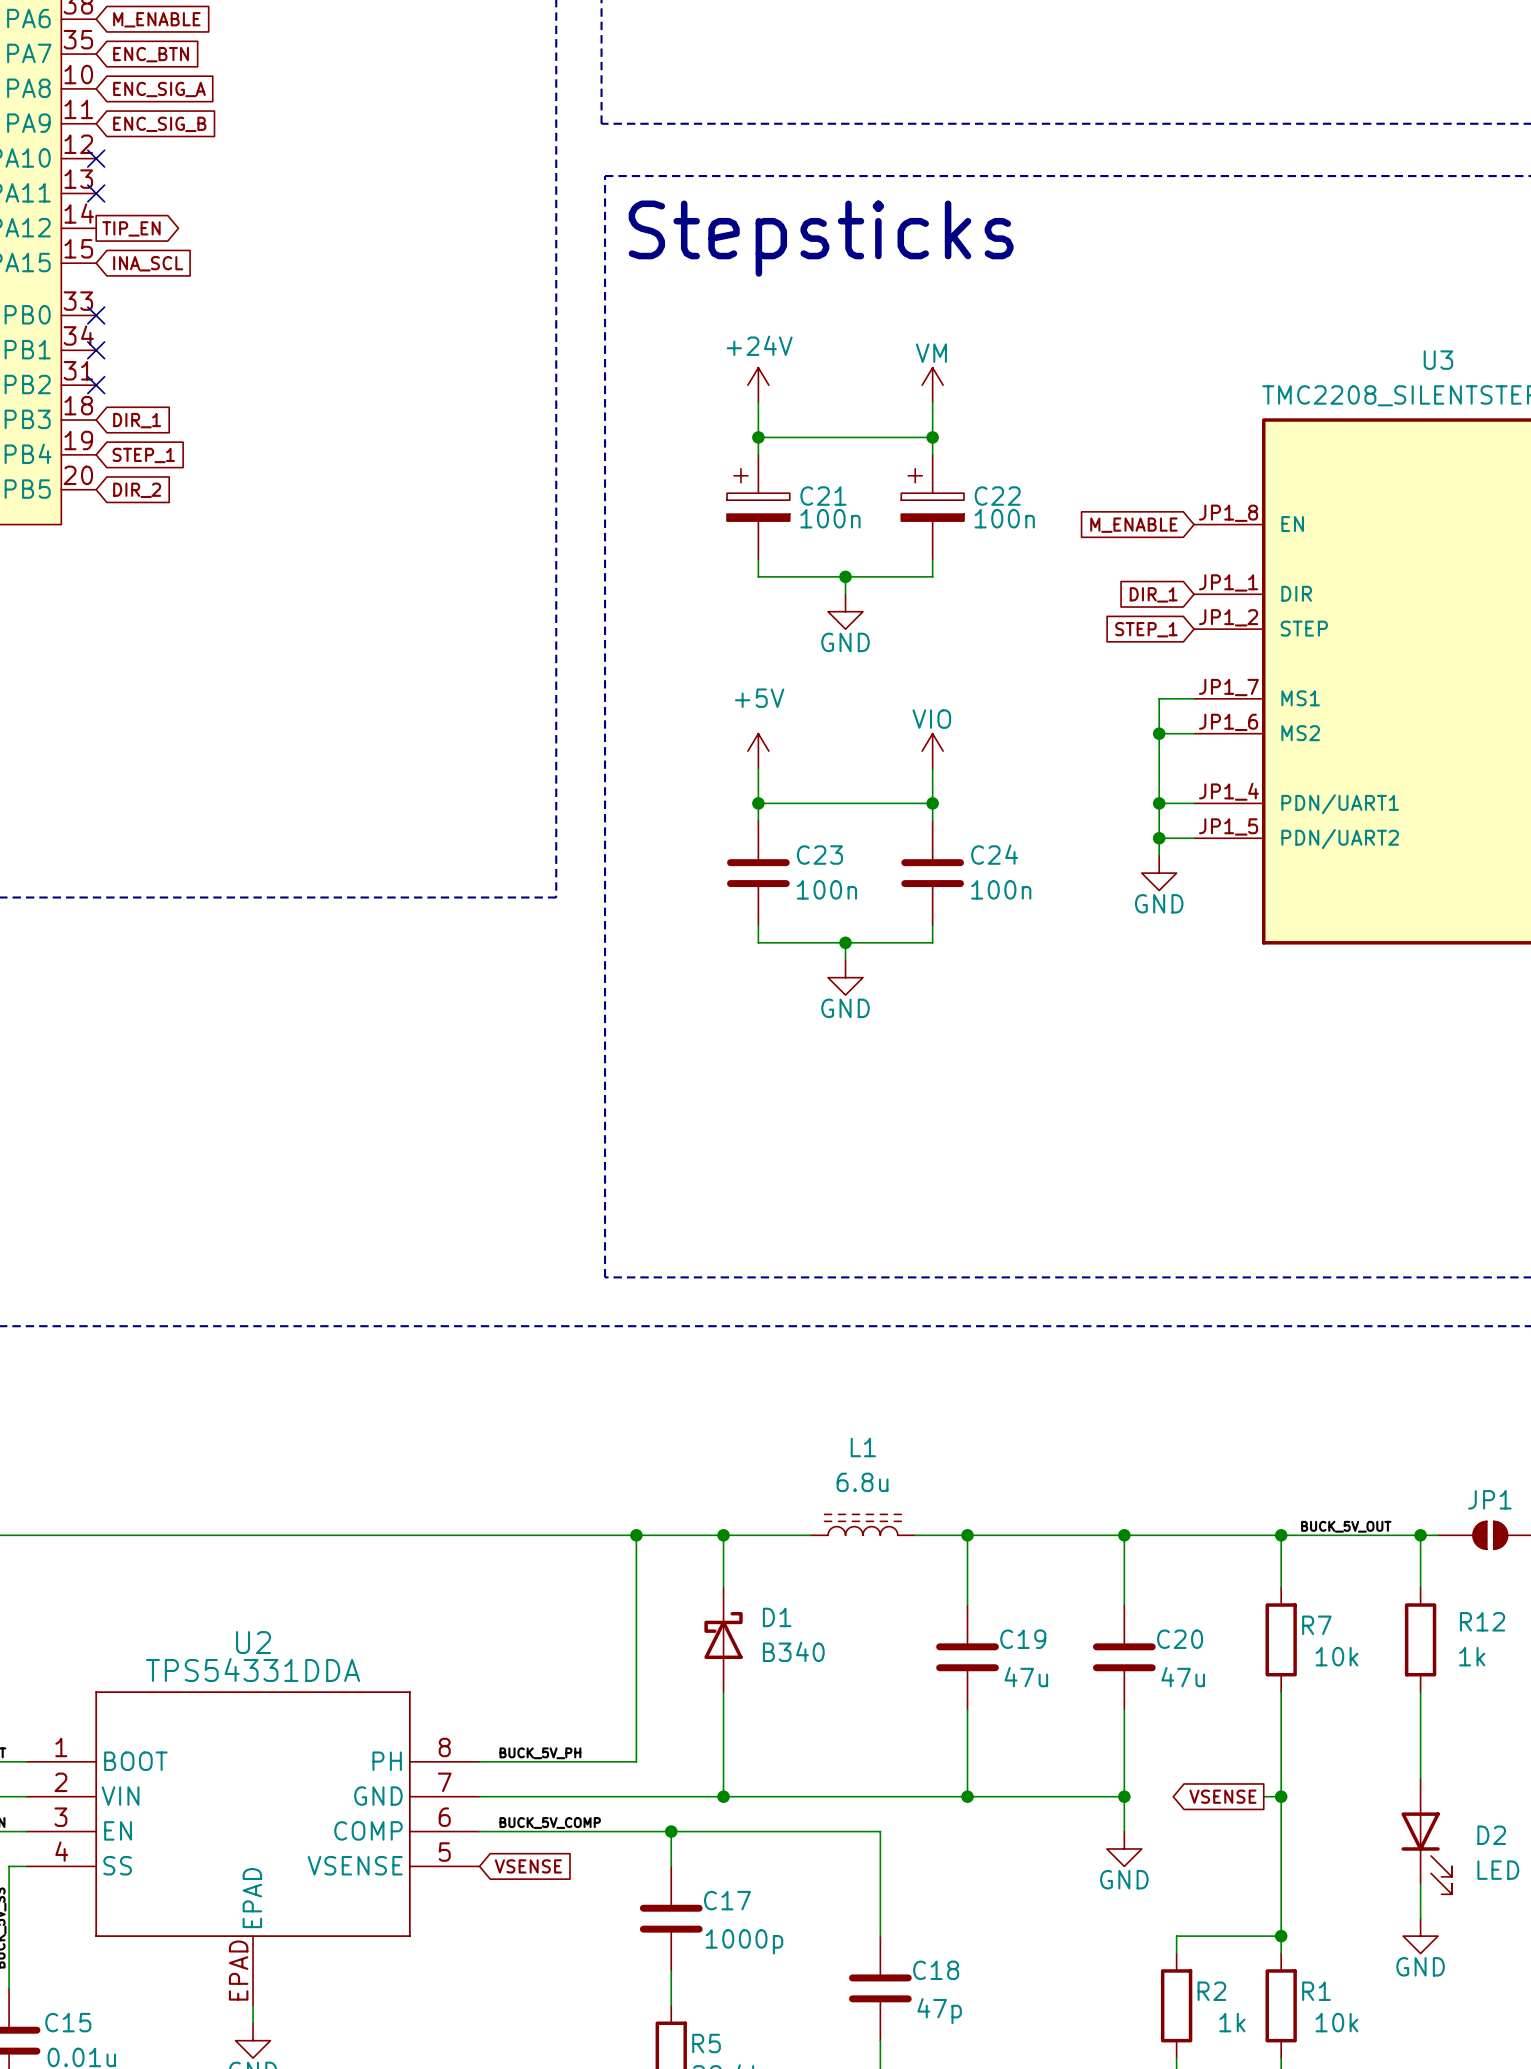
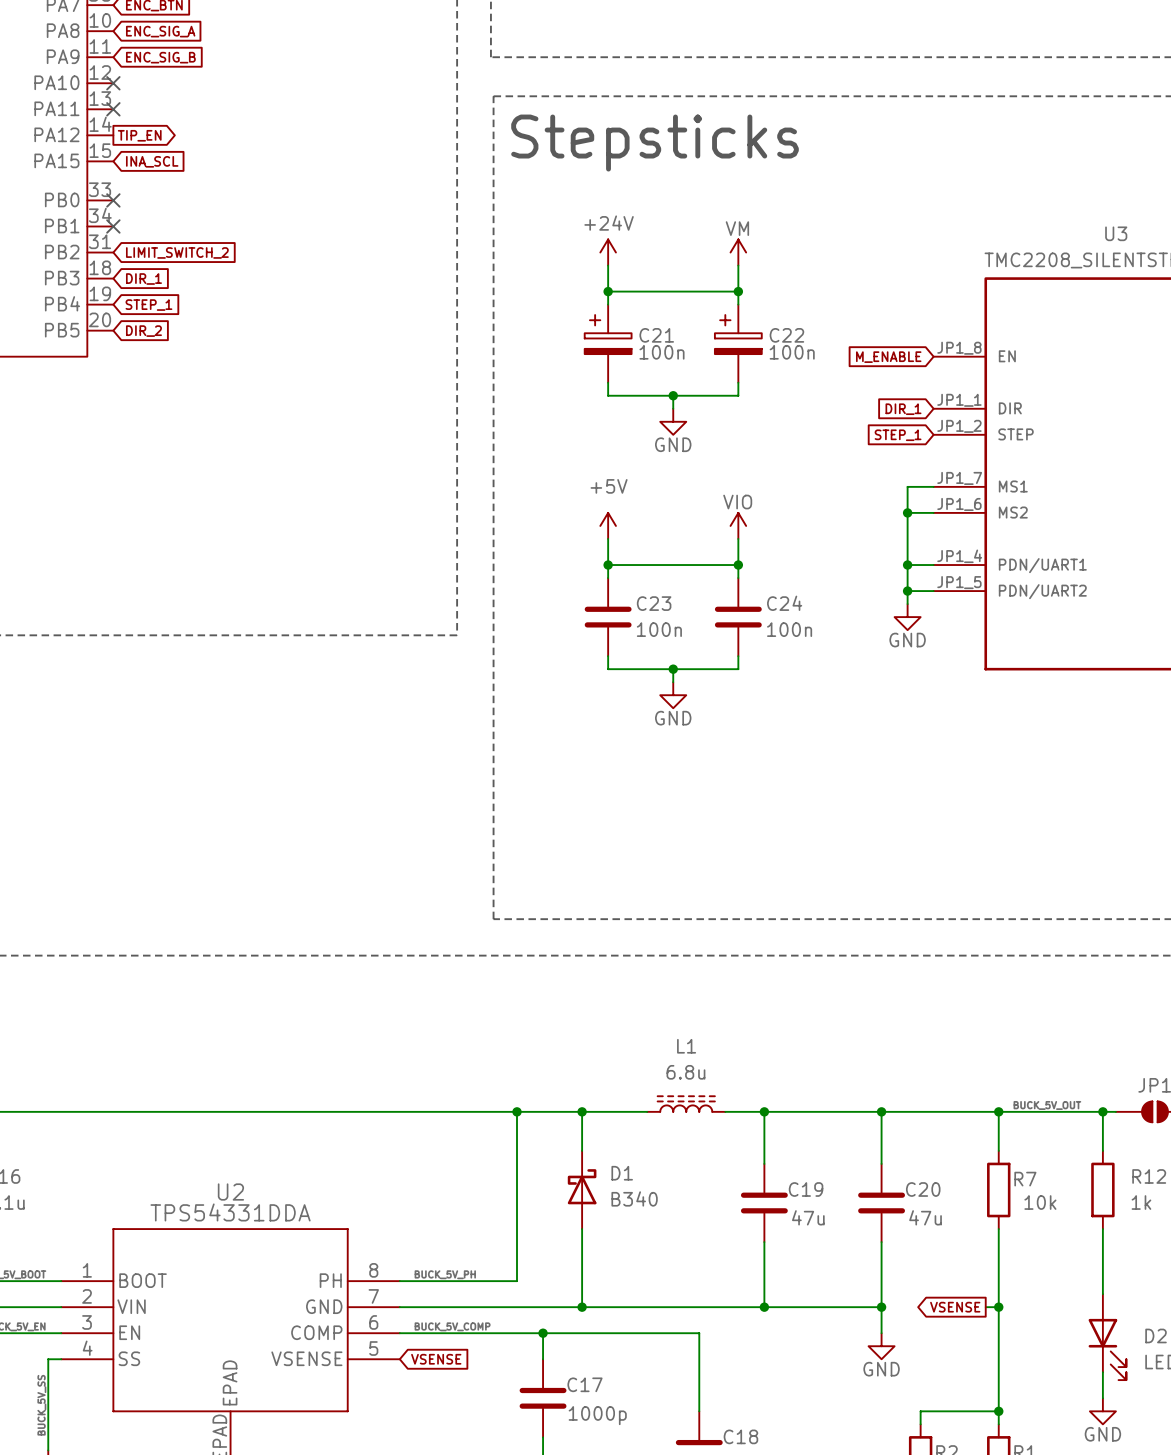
no-connect mark: (96, 385) -> none
global label: none -> LIMIT_SWITCH_2 (177, 252)

